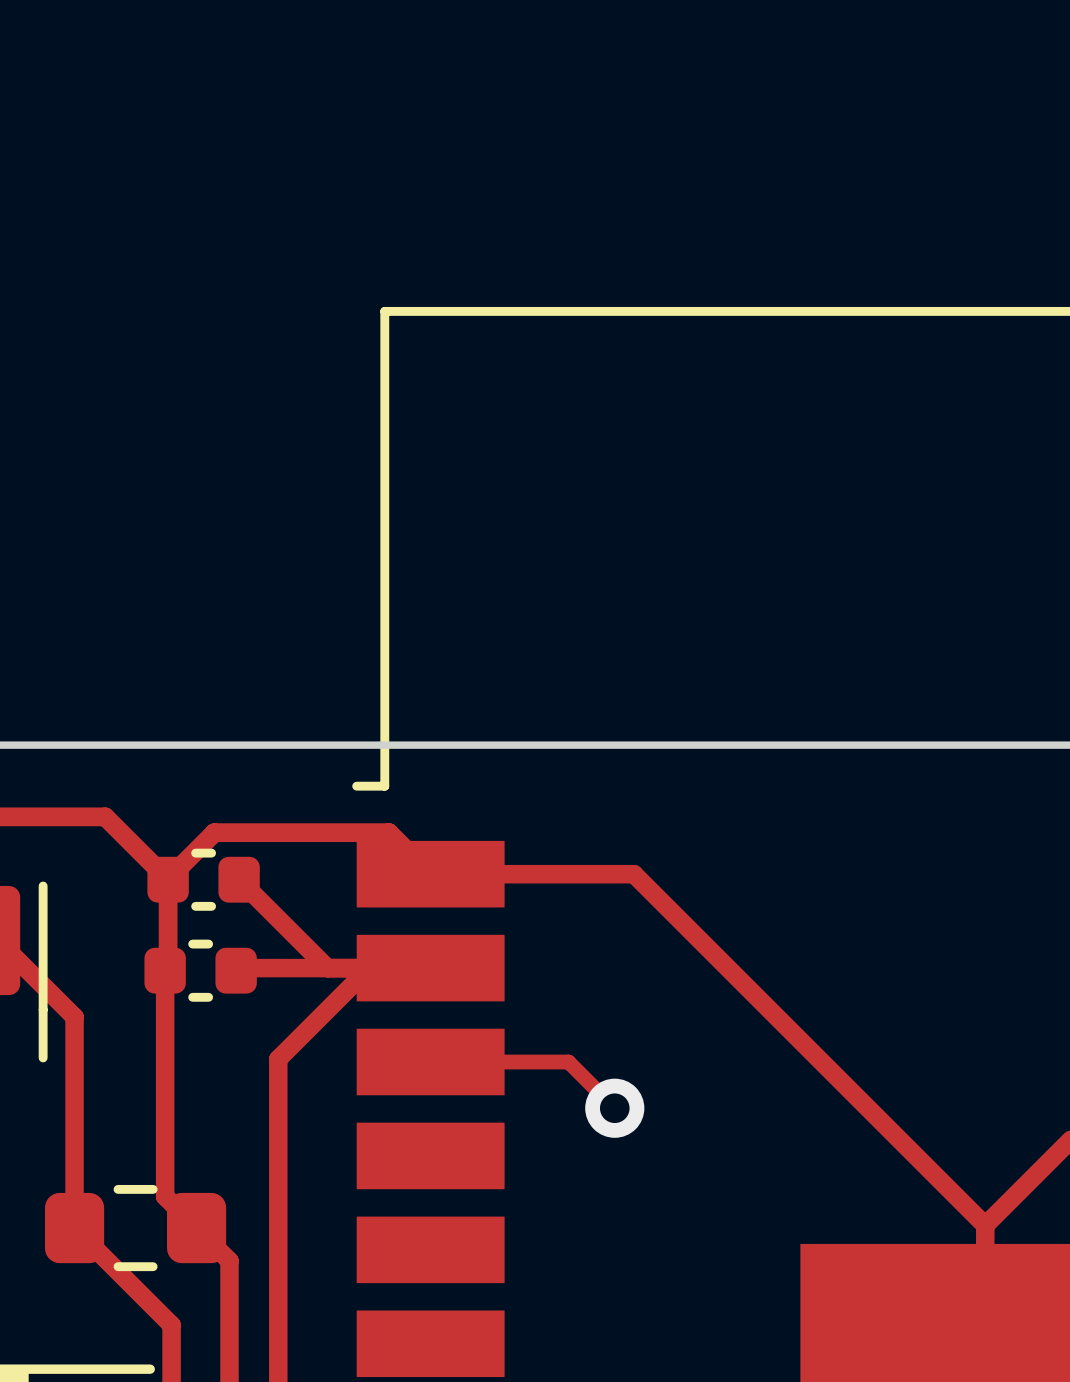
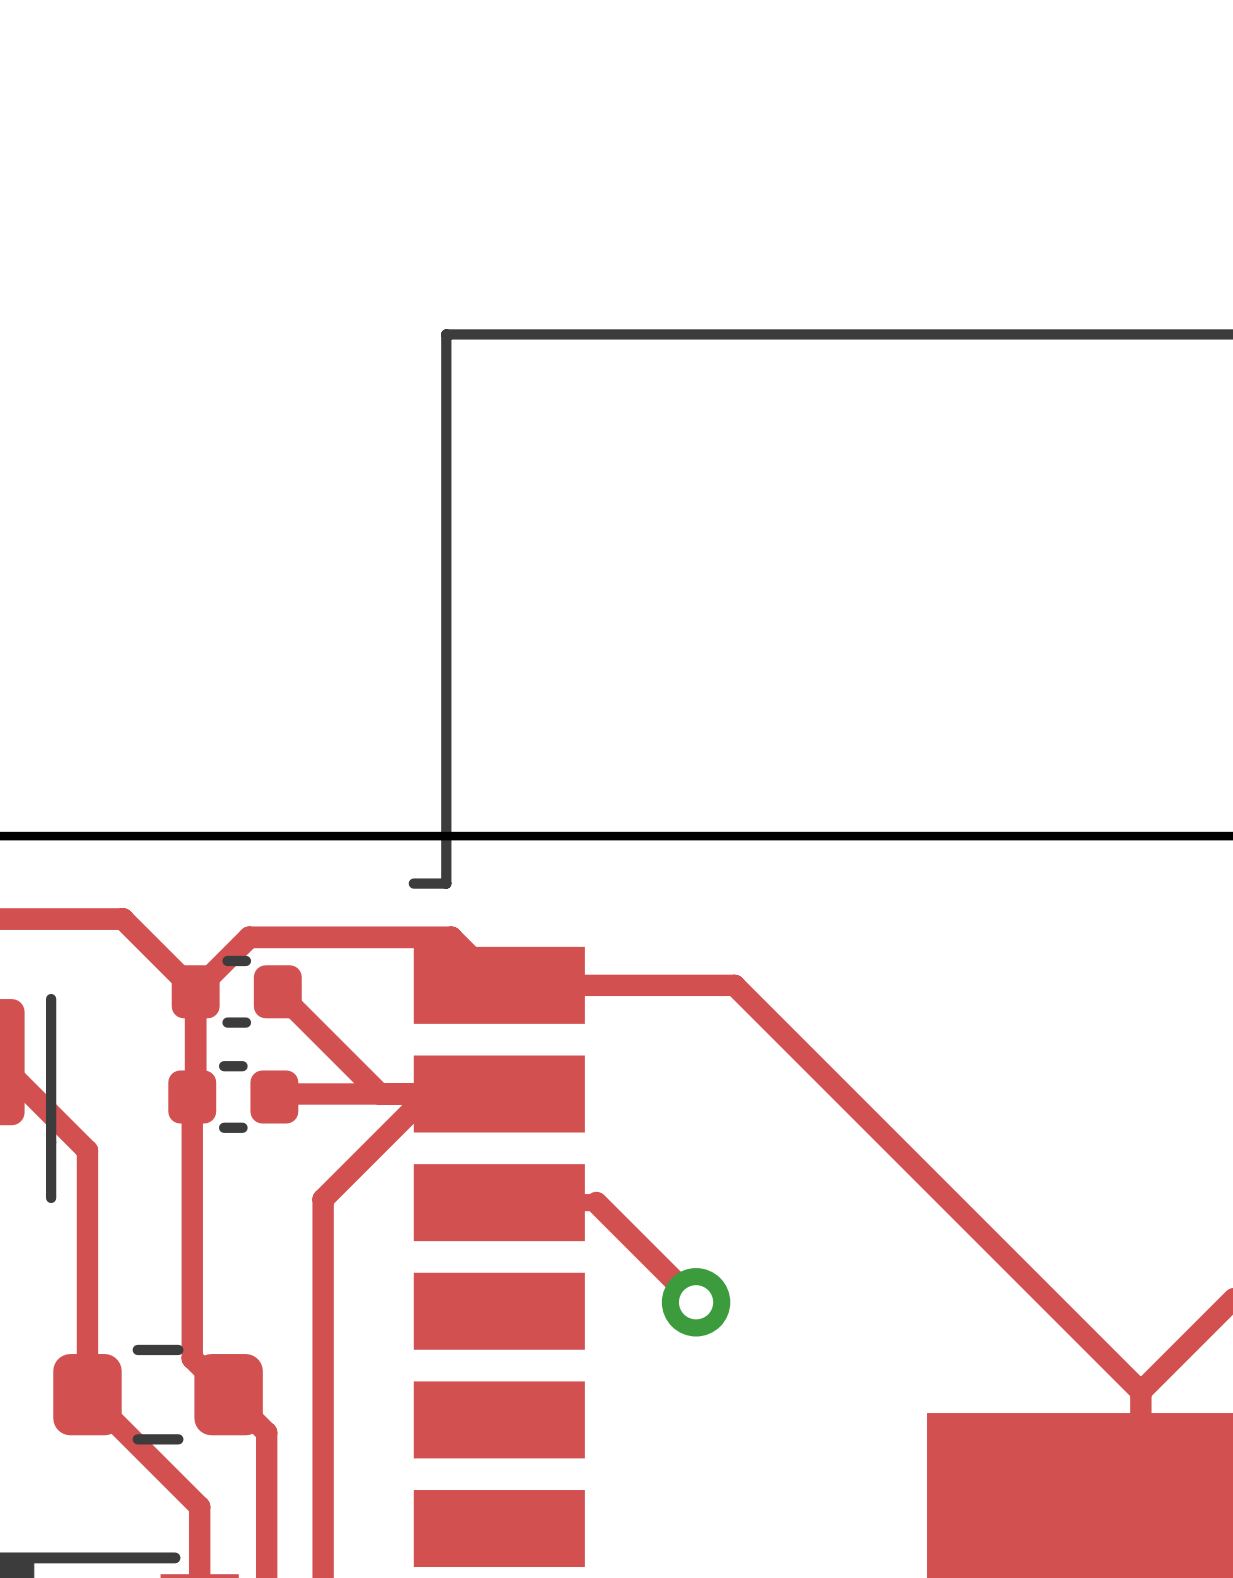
track: (514, 1062) (568, 1062) (614, 1108) -> (596, 1202) (696, 1302)
via position: (614, 1108) -> (696, 1302)

